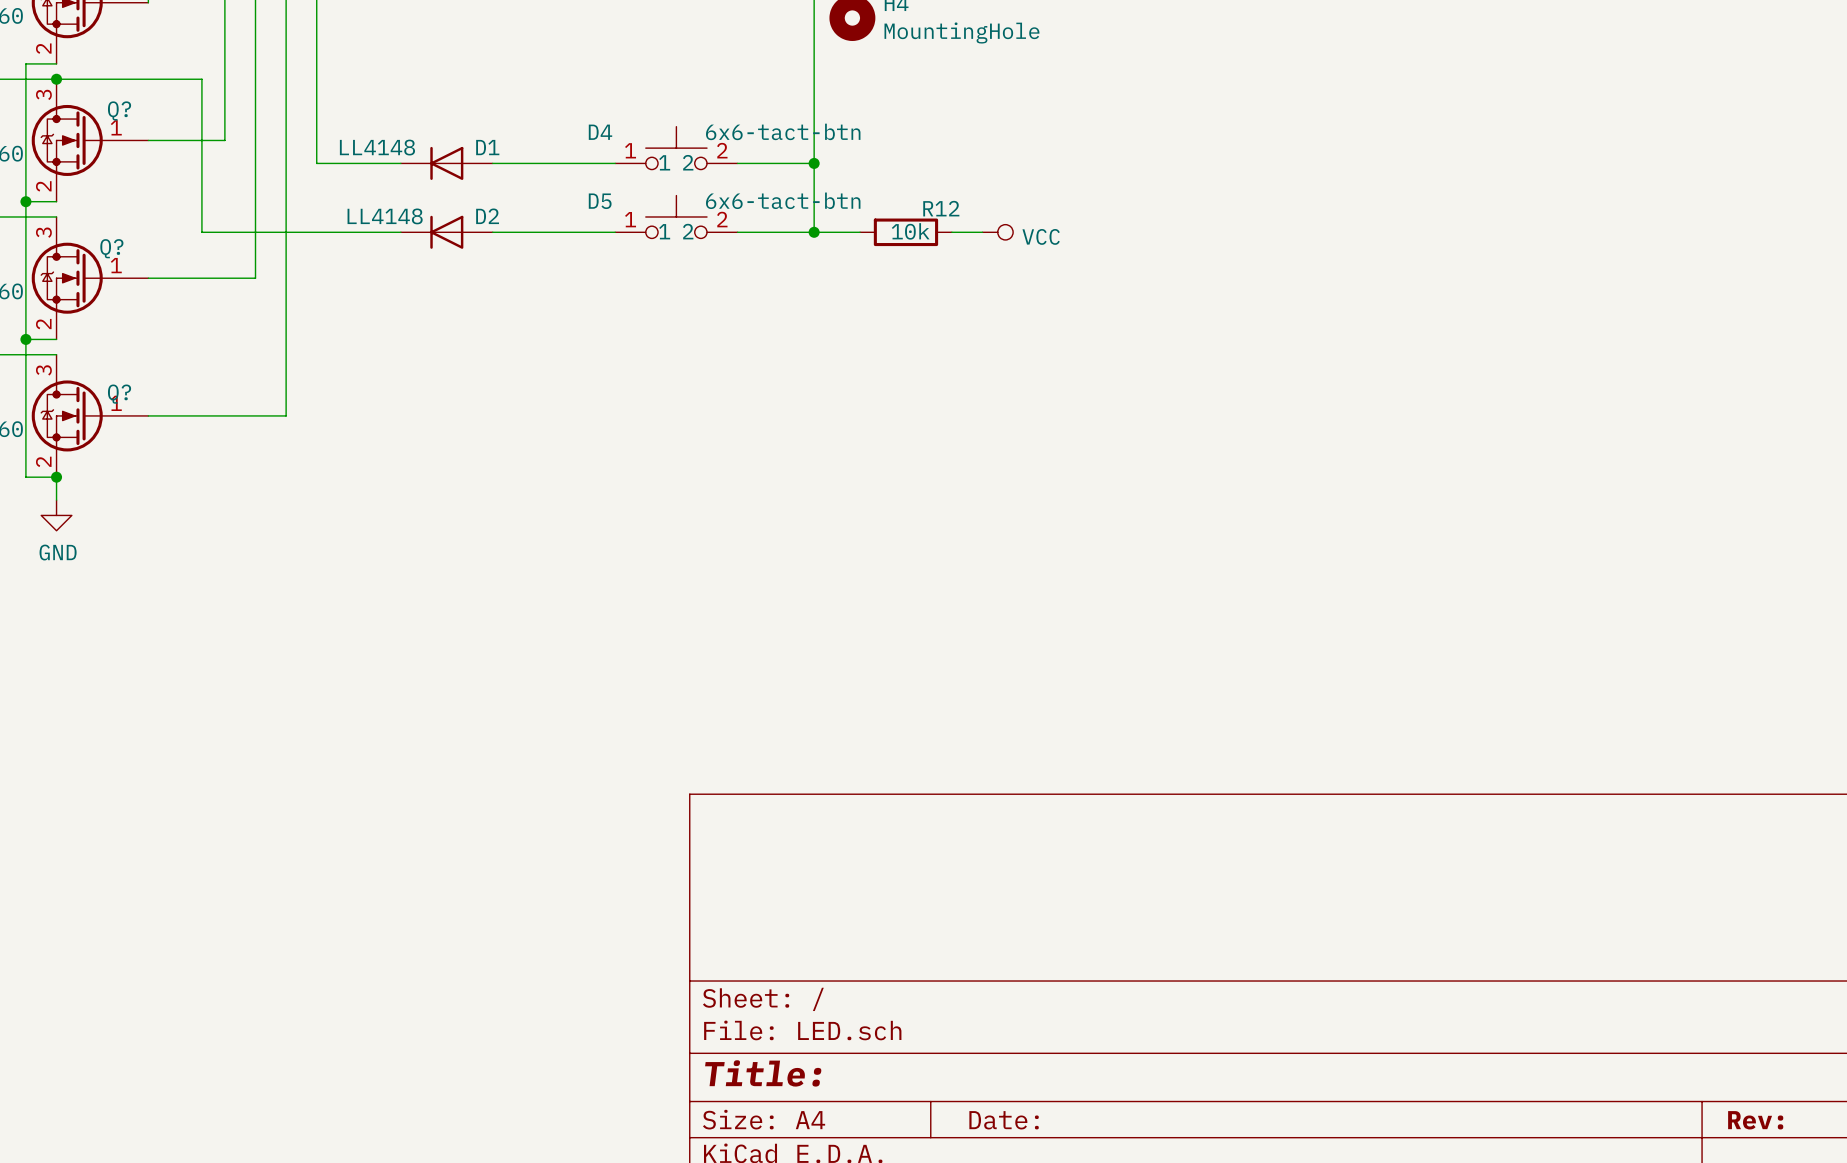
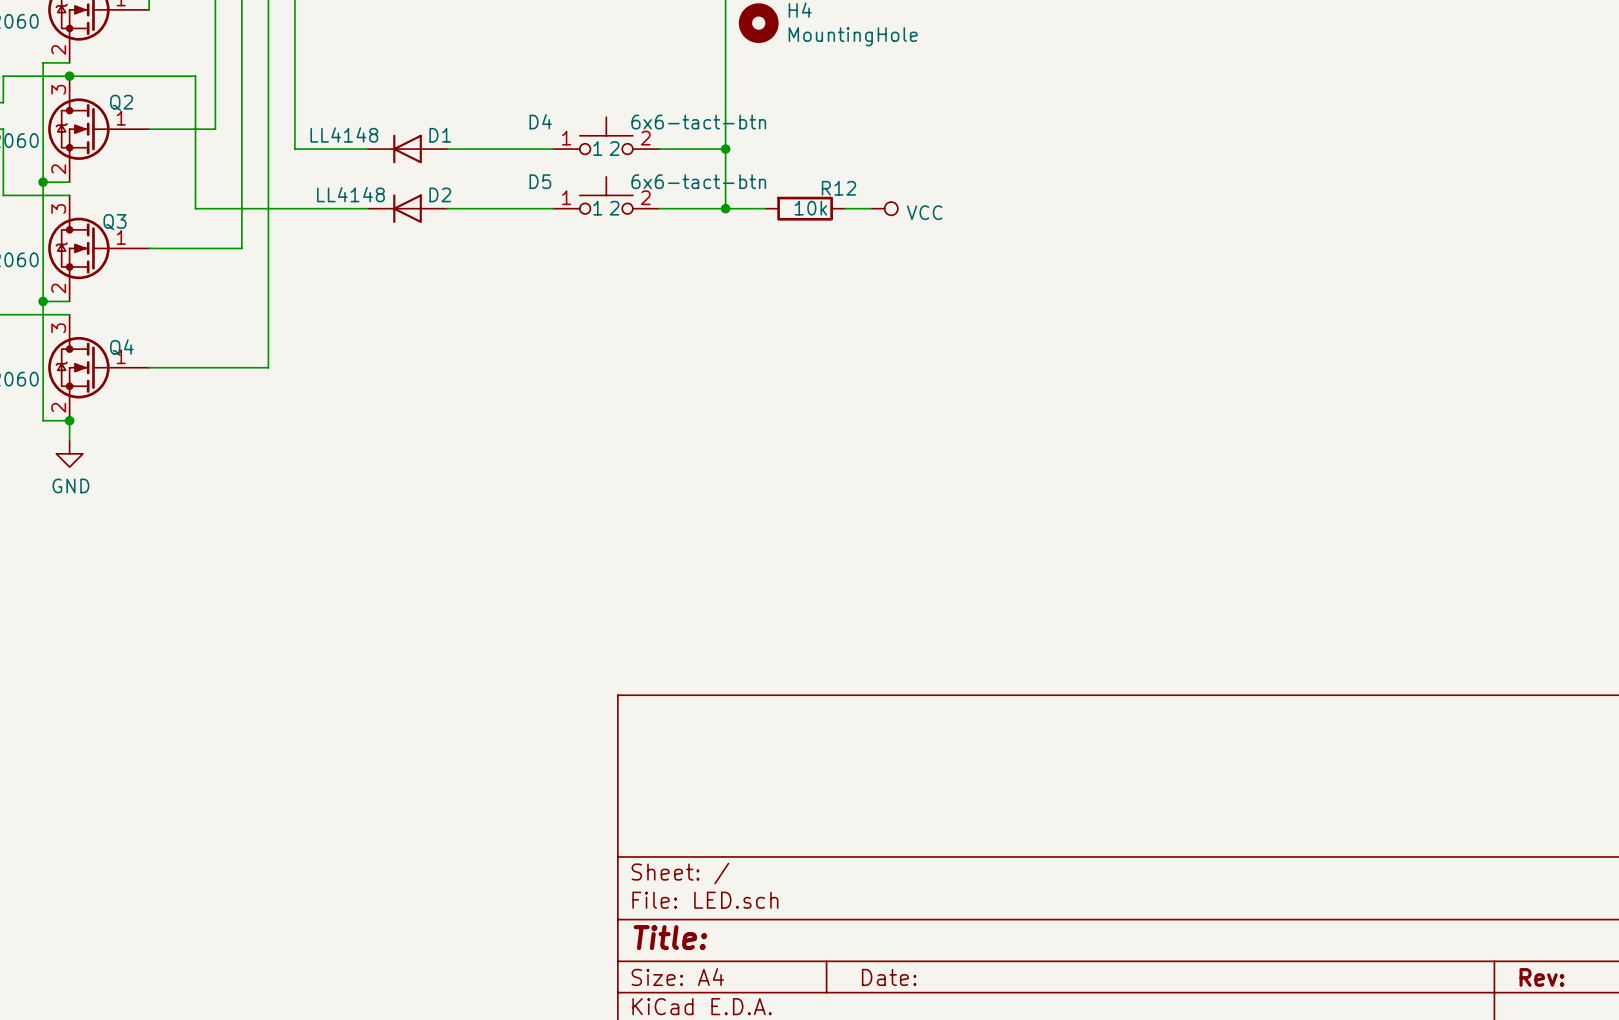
Q? name: Q? (119, 110) -> Q2 (121, 102)
Q? name: Q? (111, 248) -> Q3 (114, 222)
Q? name: Q? (119, 394) -> Q4 (121, 347)

